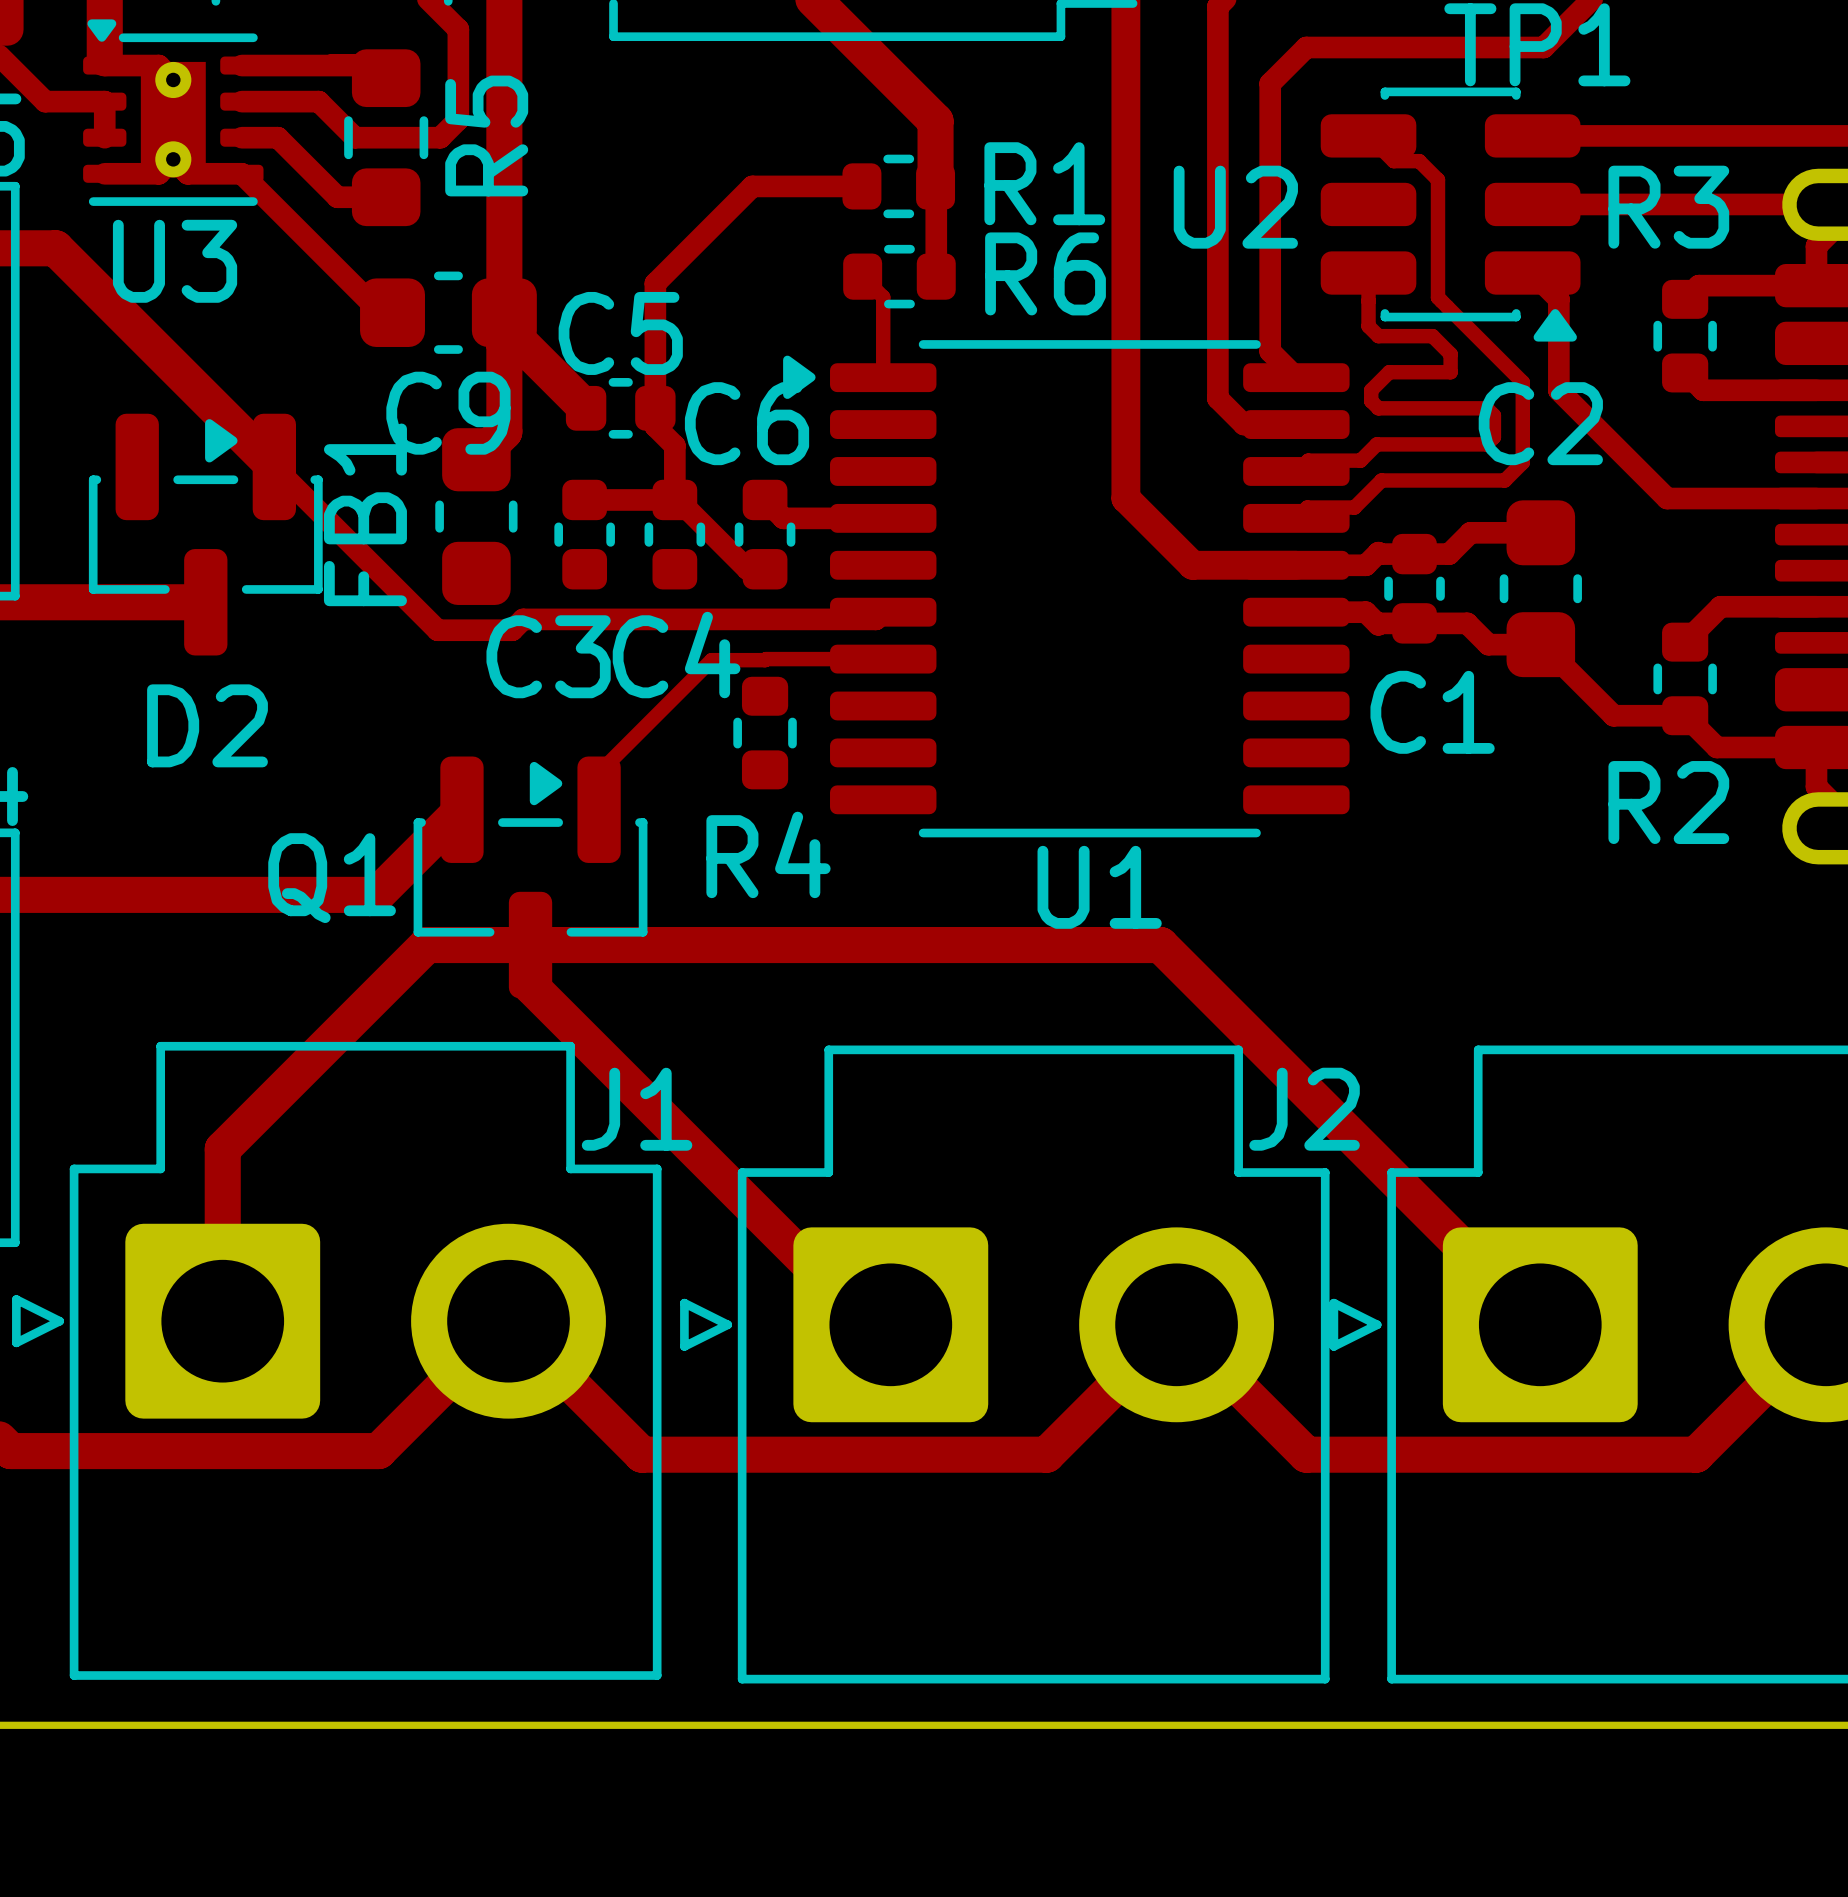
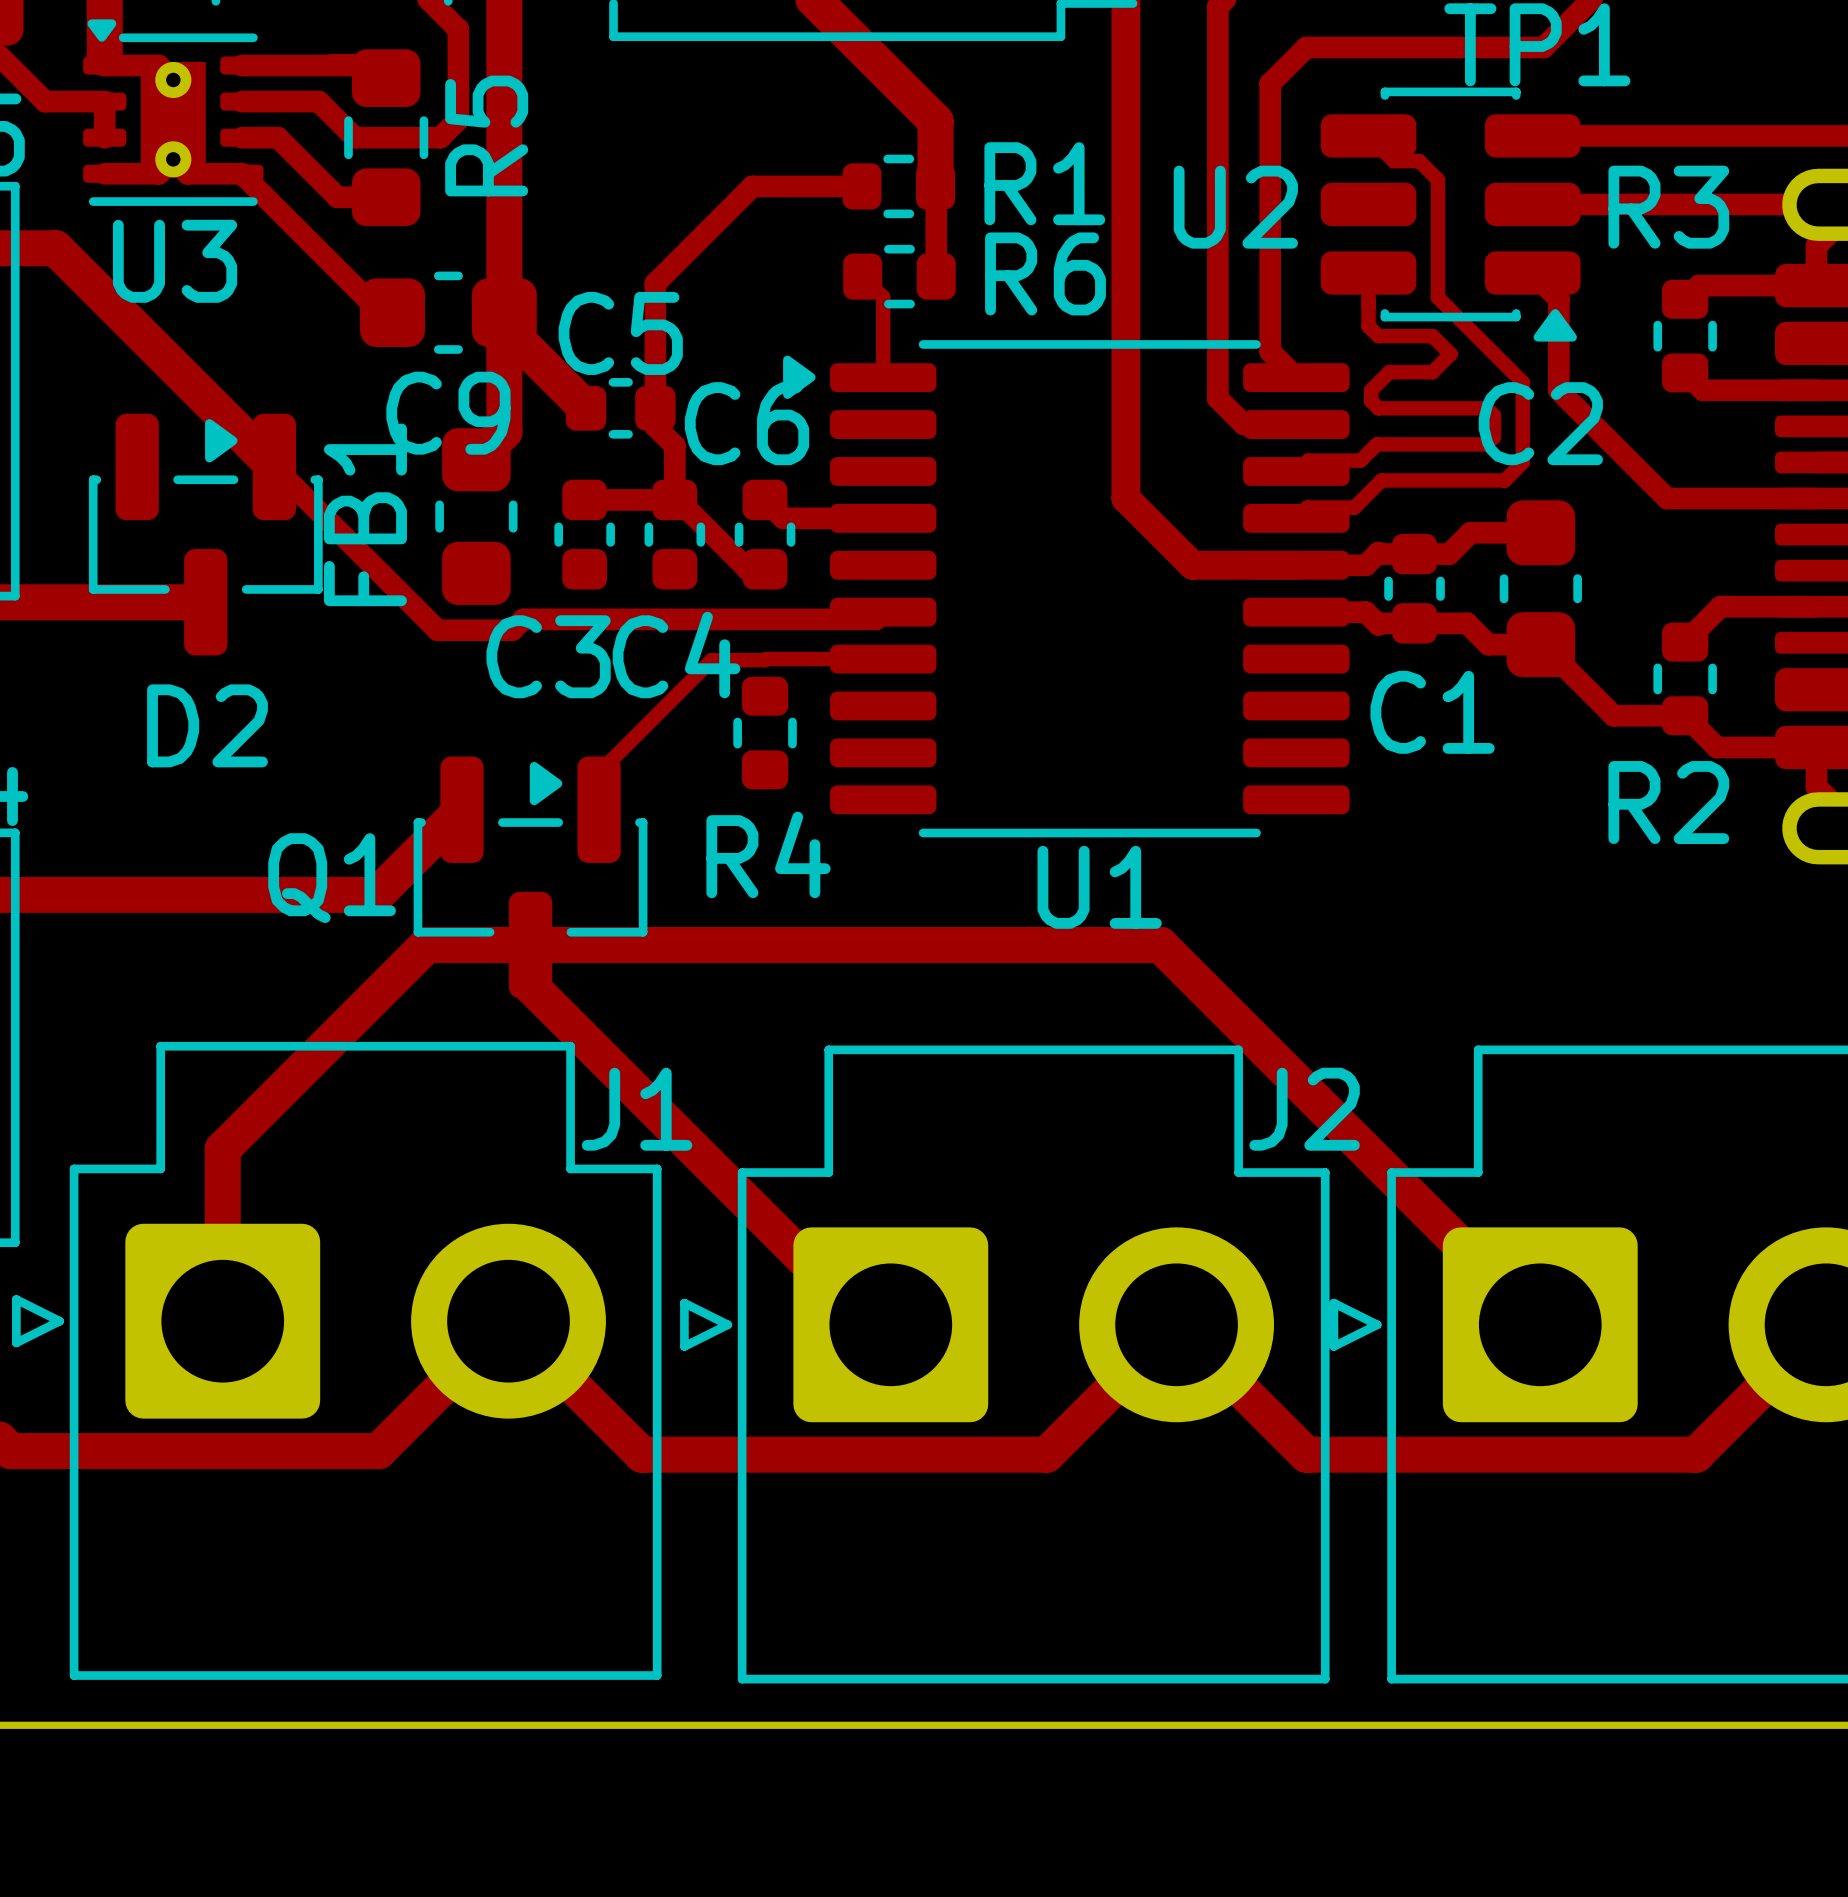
track: (1450, 354) (1450, 372) (1432, 372) -> (1450, 354) (1432, 372)

